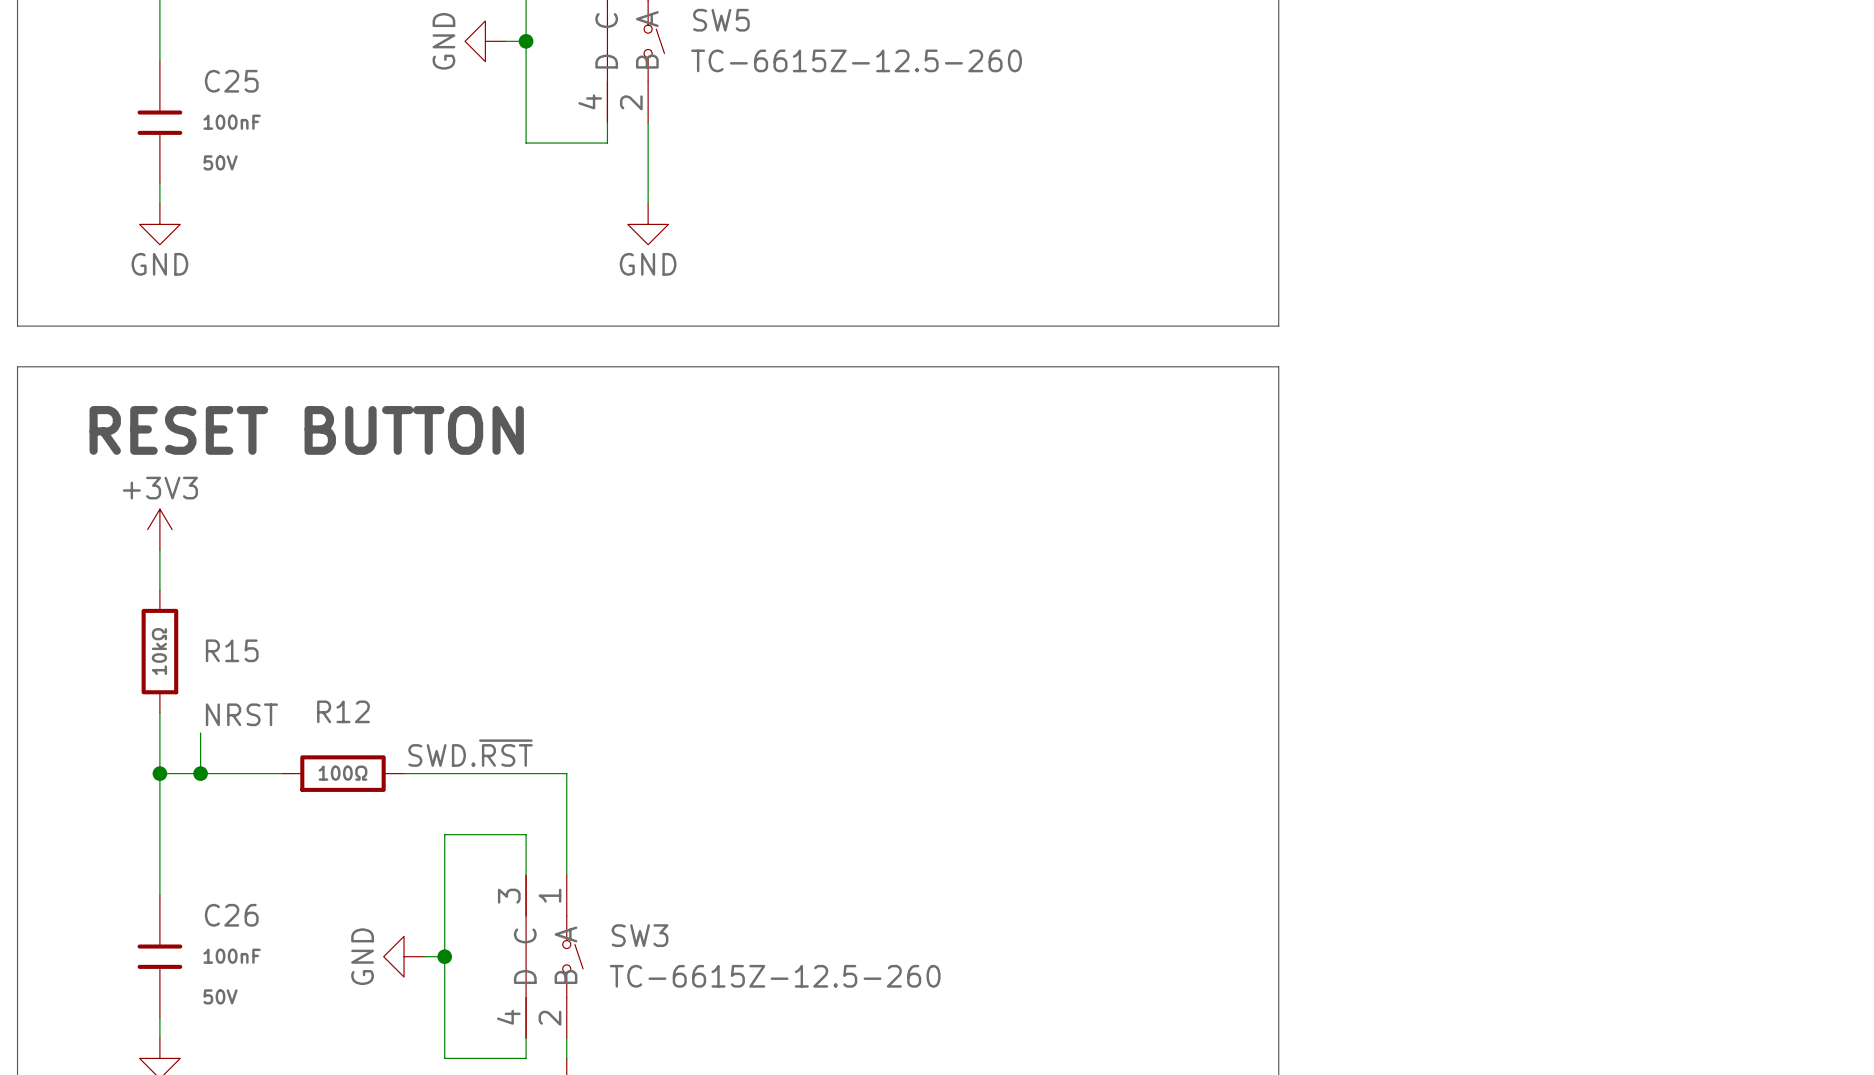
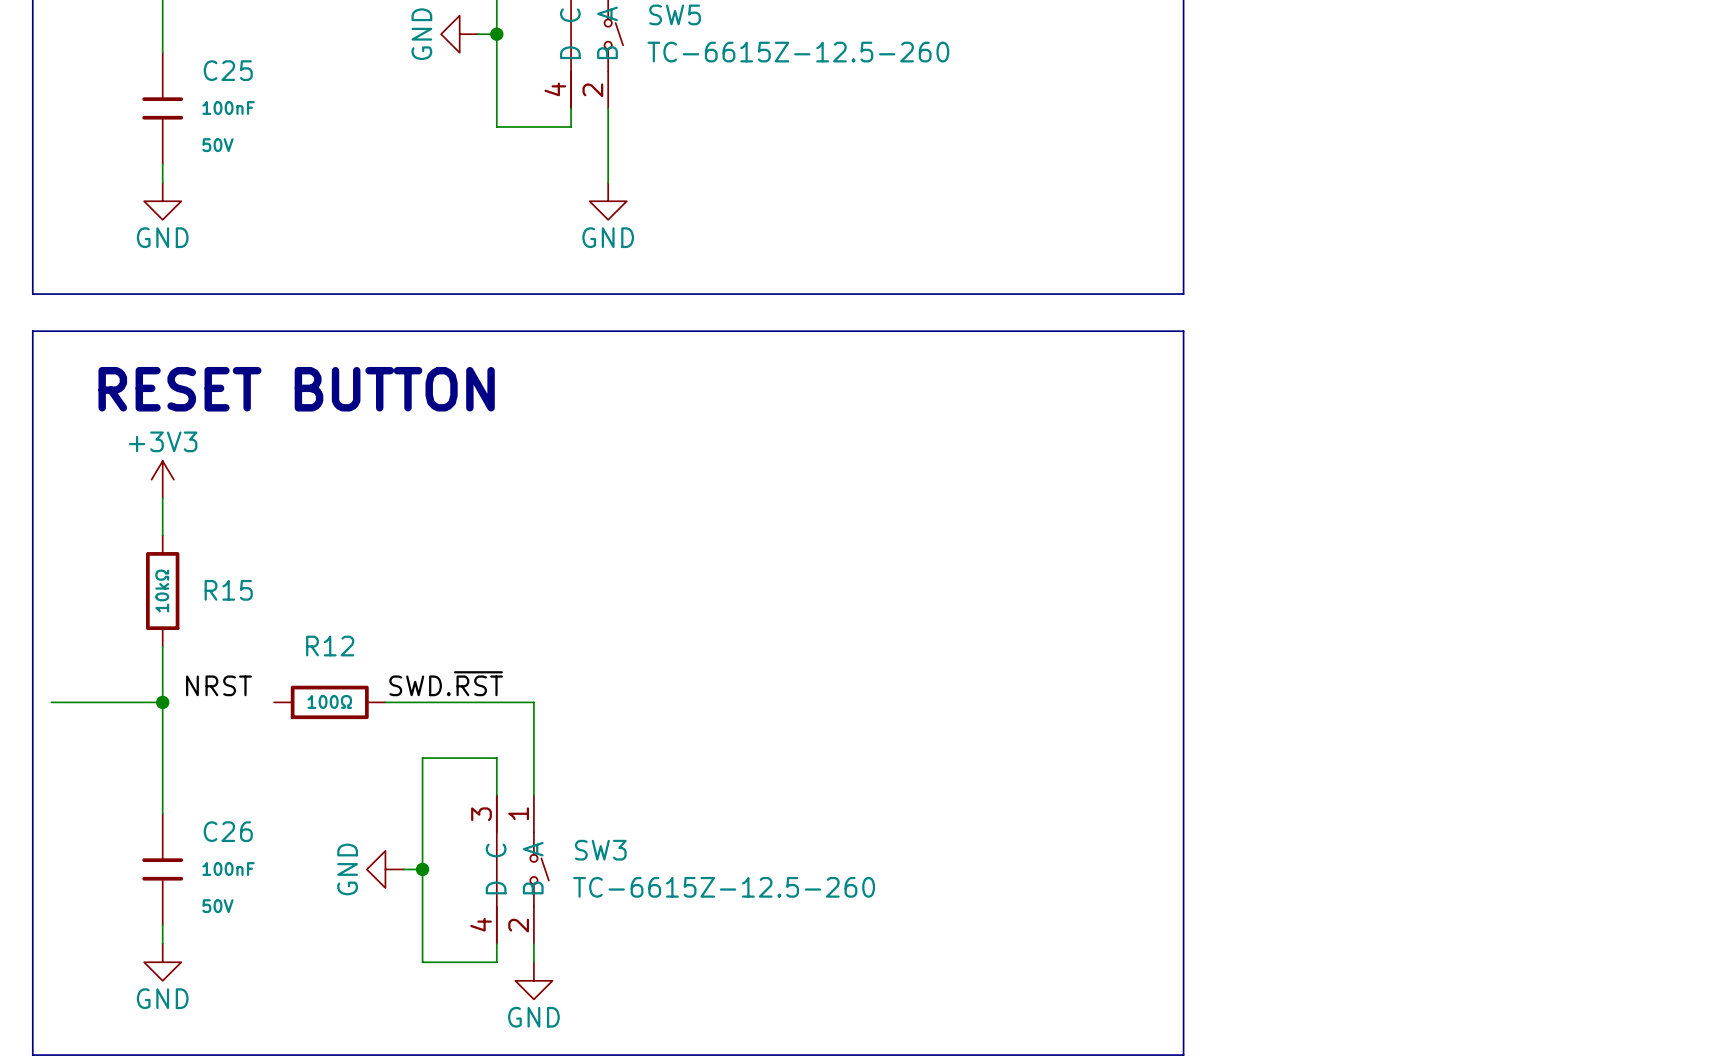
label position: NRST (241, 714) -> NRST (218, 685)
wire: (200, 732) (200, 773) -> none
wire: (159, 773) (281, 773) -> (162, 702) (51, 702)
junction: (200, 773) -> none

